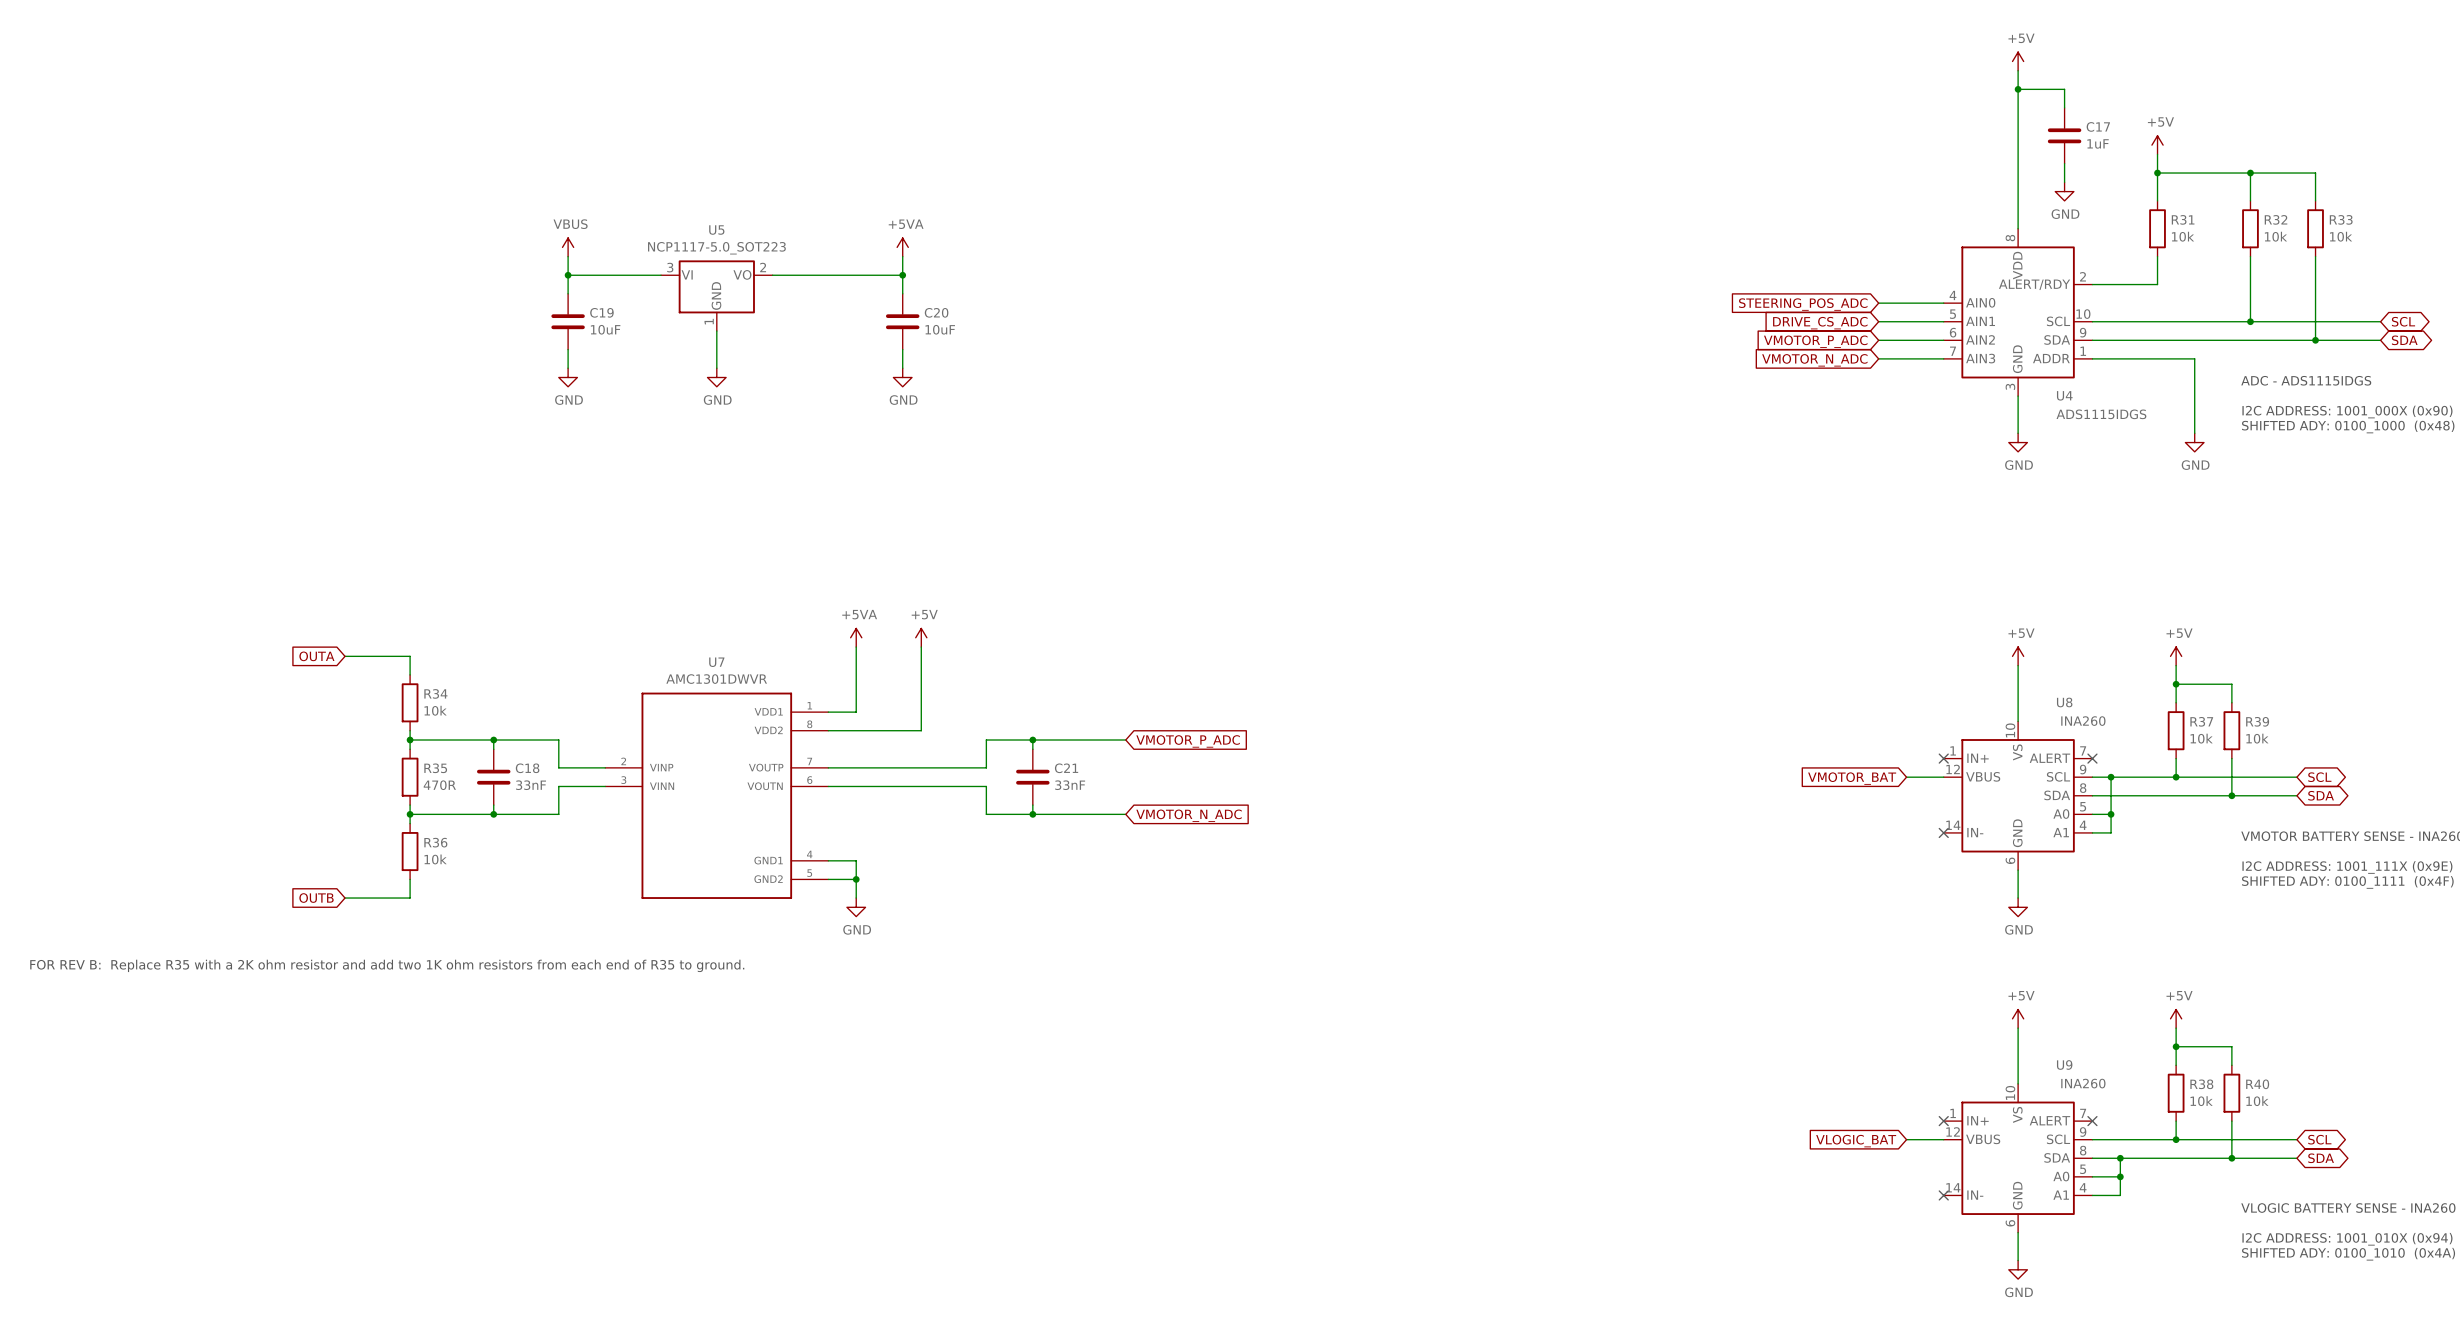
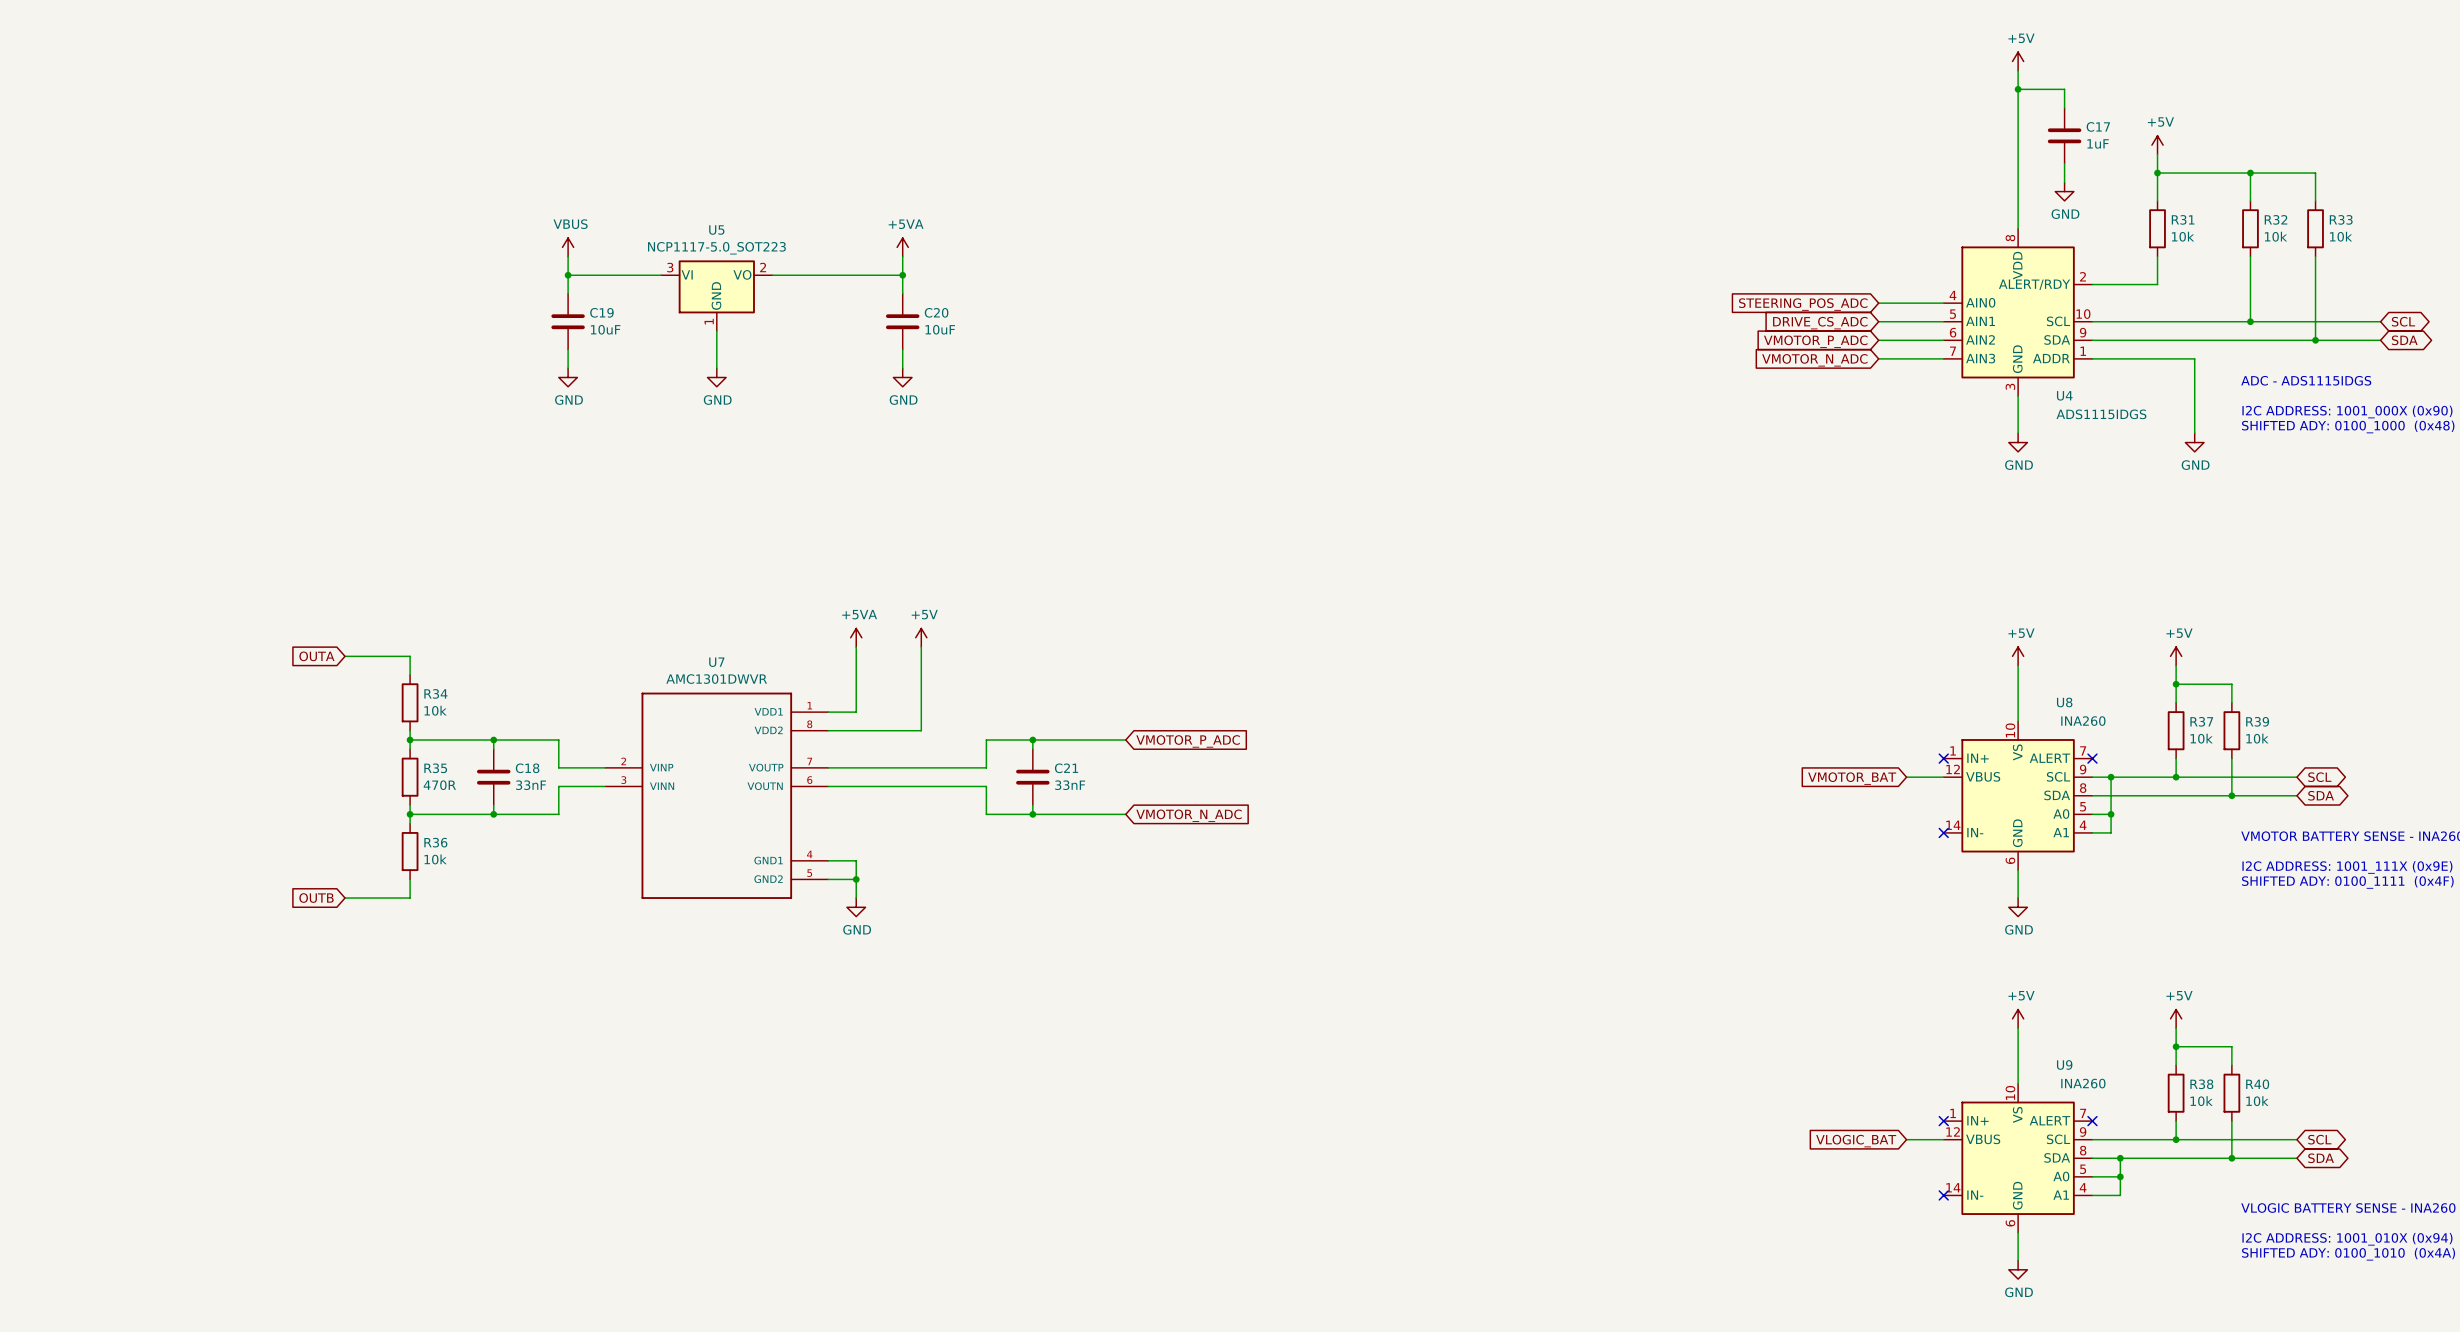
text: FOR REV B: Replace R35 with a 2K ohm resistor and add two 1K ohm resistors from each end of R35 to ground. (387, 965) -> none

